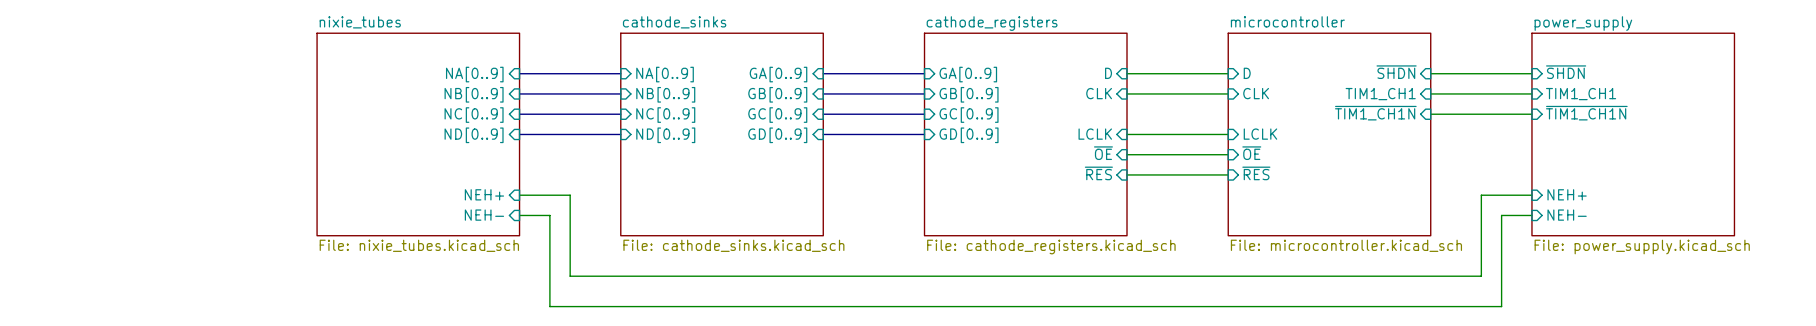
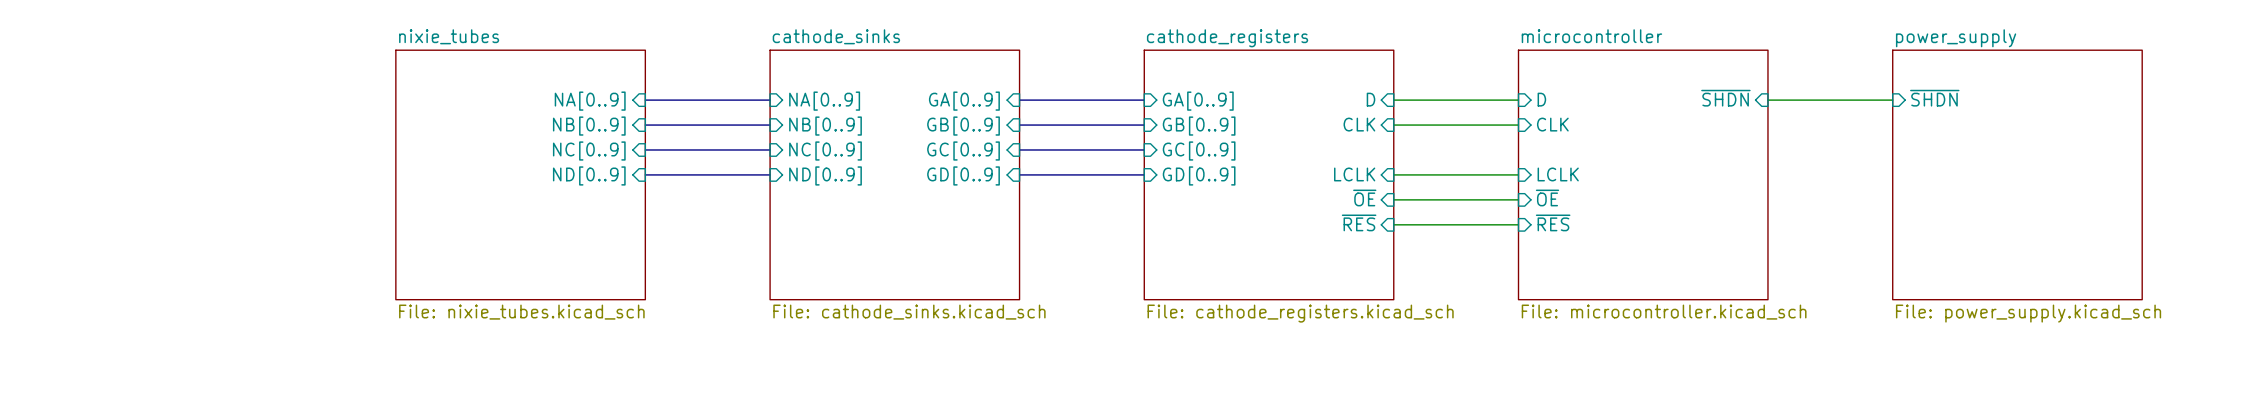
wire: (1430, 93) (1531, 93) -> none
sheet pin: TIM1_CH1 (1380, 94) -> none
sheet pin: TIM1_CH1 (1581, 94) -> none
sheet pin: ~{TIM1_CH1N} (1375, 113) -> none
sheet pin: ~{TIM1_CH1N} (1586, 113) -> none
wire: (1430, 114) (1531, 114) -> none
sheet pin: NEH+ (484, 194) -> none
sheet pin: NEH+ (1567, 194) -> none
wire: (519, 195) (570, 195) (570, 276) (1481, 276) (1481, 195) (1531, 195) -> none
sheet pin: NEH- (484, 215) -> none
wire: (519, 215) (549, 215) (549, 306) (1501, 306) (1501, 215) (1531, 215) -> none
sheet pin: NEH- (1567, 215) -> none

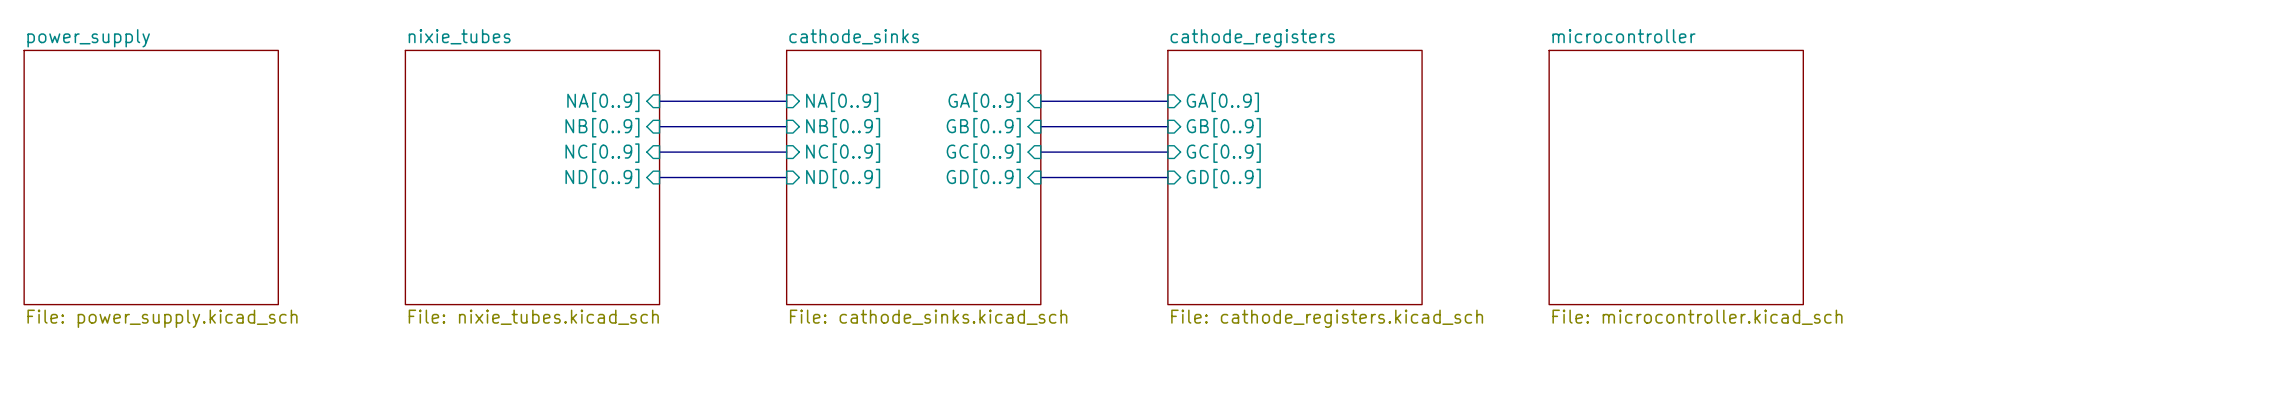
sheet pin: ~{SHDN} (1725, 98) -> none
sheet pin: ~{SHDN} (1934, 98) -> none
sheet pin: D (1371, 99) -> none
sheet pin: D (1541, 99) -> none
wire: (1393, 100) (1518, 100) -> none
wire: (1767, 100) (1892, 100) -> none
sheet pin: CLK (1359, 124) -> none
sheet pin: CLK (1552, 124) -> none
wire: (1393, 125) (1518, 125) -> none
sheet power_supply: none -> File: power_supply.kicad_sch (151, 177)
sheet pin: LCLK (1354, 174) -> none
wire: (1393, 174) (1518, 174) -> none
sheet pin: LCLK (1558, 174) -> none
sheet power_supply: File: power_supply.kicad_sch (2017, 174) -> none
sheet pin: ~{OE} (1364, 197) -> none
sheet pin: ~{OE} (1547, 197) -> none
wire: (1393, 199) (1518, 199) -> none
sheet pin: ~{RES} (1359, 222) -> none
sheet pin: ~{RES} (1553, 222) -> none
wire: (1393, 224) (1518, 224) -> none

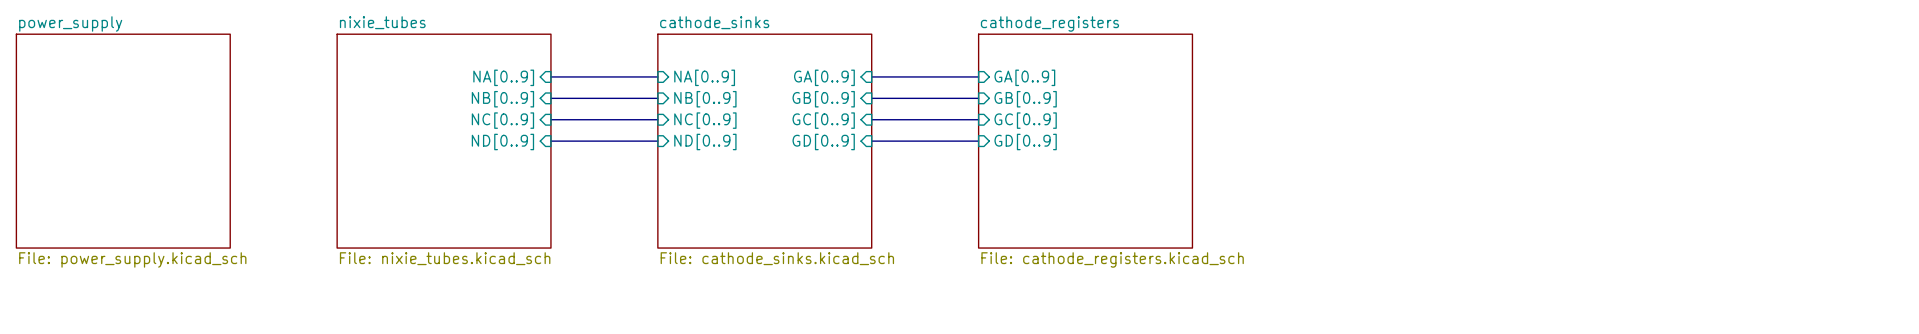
sheet microcontroller: File: microcontroller.kicad_sch (1676, 177) -> none

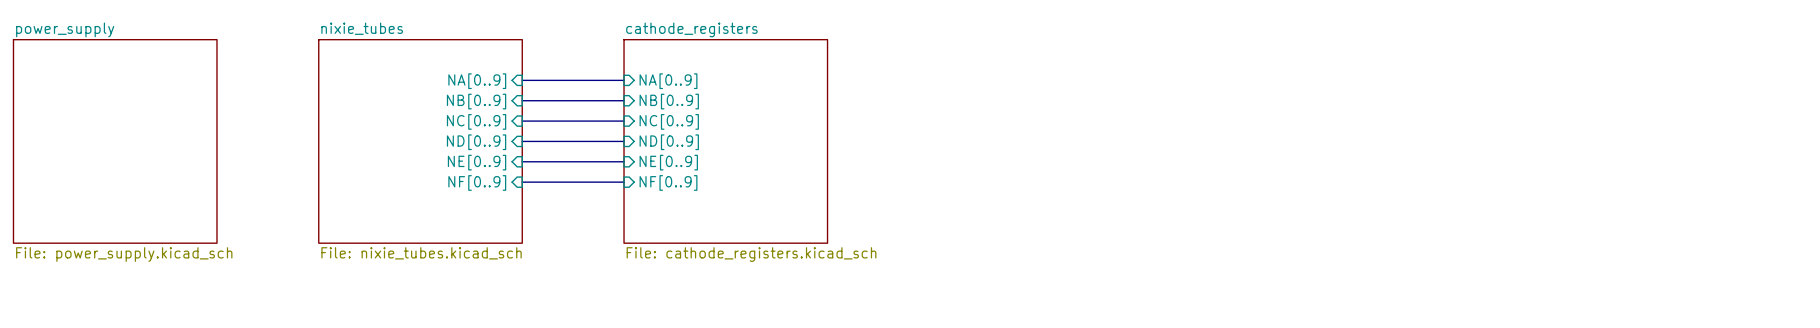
sheet cathode_sinks name: cathode_sinks (714, 22) -> cathode_registers (691, 29)
bus: (871, 76) (978, 76) -> none
sheet pin: GA[0..9] (824, 77) -> none
sheet pin: GA[0..9] (1024, 77) -> none
bus: (871, 98) (978, 98) -> none
sheet pin: GB[0..9] (823, 99) -> none
sheet pin: GB[0..9] (1025, 99) -> none
bus: (871, 119) (978, 119) -> none
sheet pin: GC[0..9] (823, 120) -> none
sheet pin: GC[0..9] (1025, 120) -> none
sheet pin: GD[0..9] (823, 141) -> none
bus: (871, 141) (978, 141) -> none
sheet pin: GD[0..9] (1025, 141) -> none
sheet cathode_registers: File: cathode_registers.kicad_sch (1085, 141) -> none
bus: none -> (522, 161) (624, 161)
sheet pin: none -> NE[0..9] (477, 162)
sheet pin: none -> NE[0..9] (668, 162)
bus: none -> (522, 182) (624, 182)
sheet pin: none -> NF[0..9] (477, 182)
sheet pin: none -> NF[0..9] (668, 182)
sheet cathode_sinks value: File: cathode_sinks.kicad_sch (777, 258) -> File: cathode_registers.kicad_sch (751, 254)

